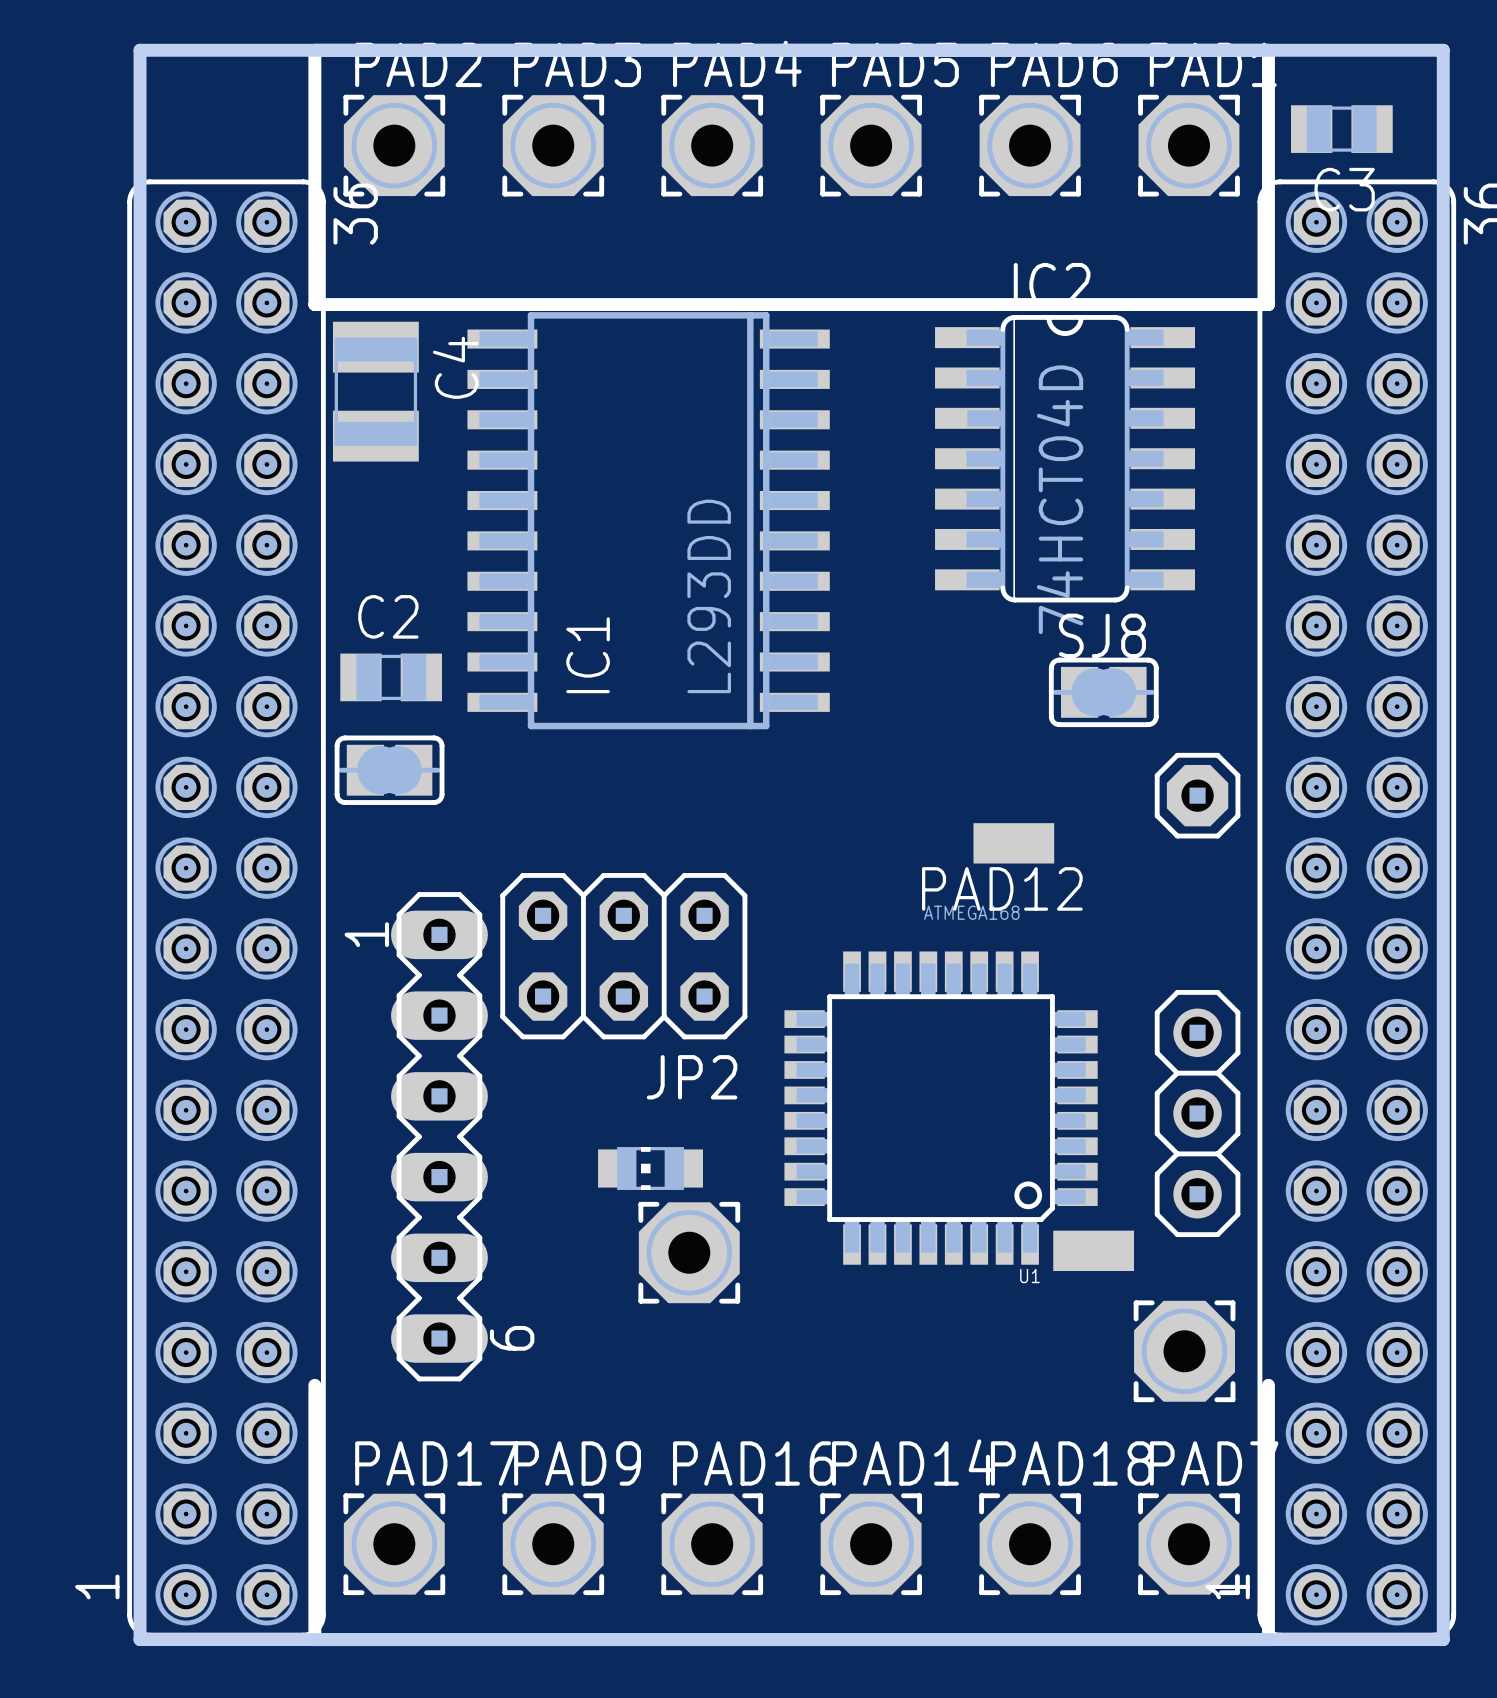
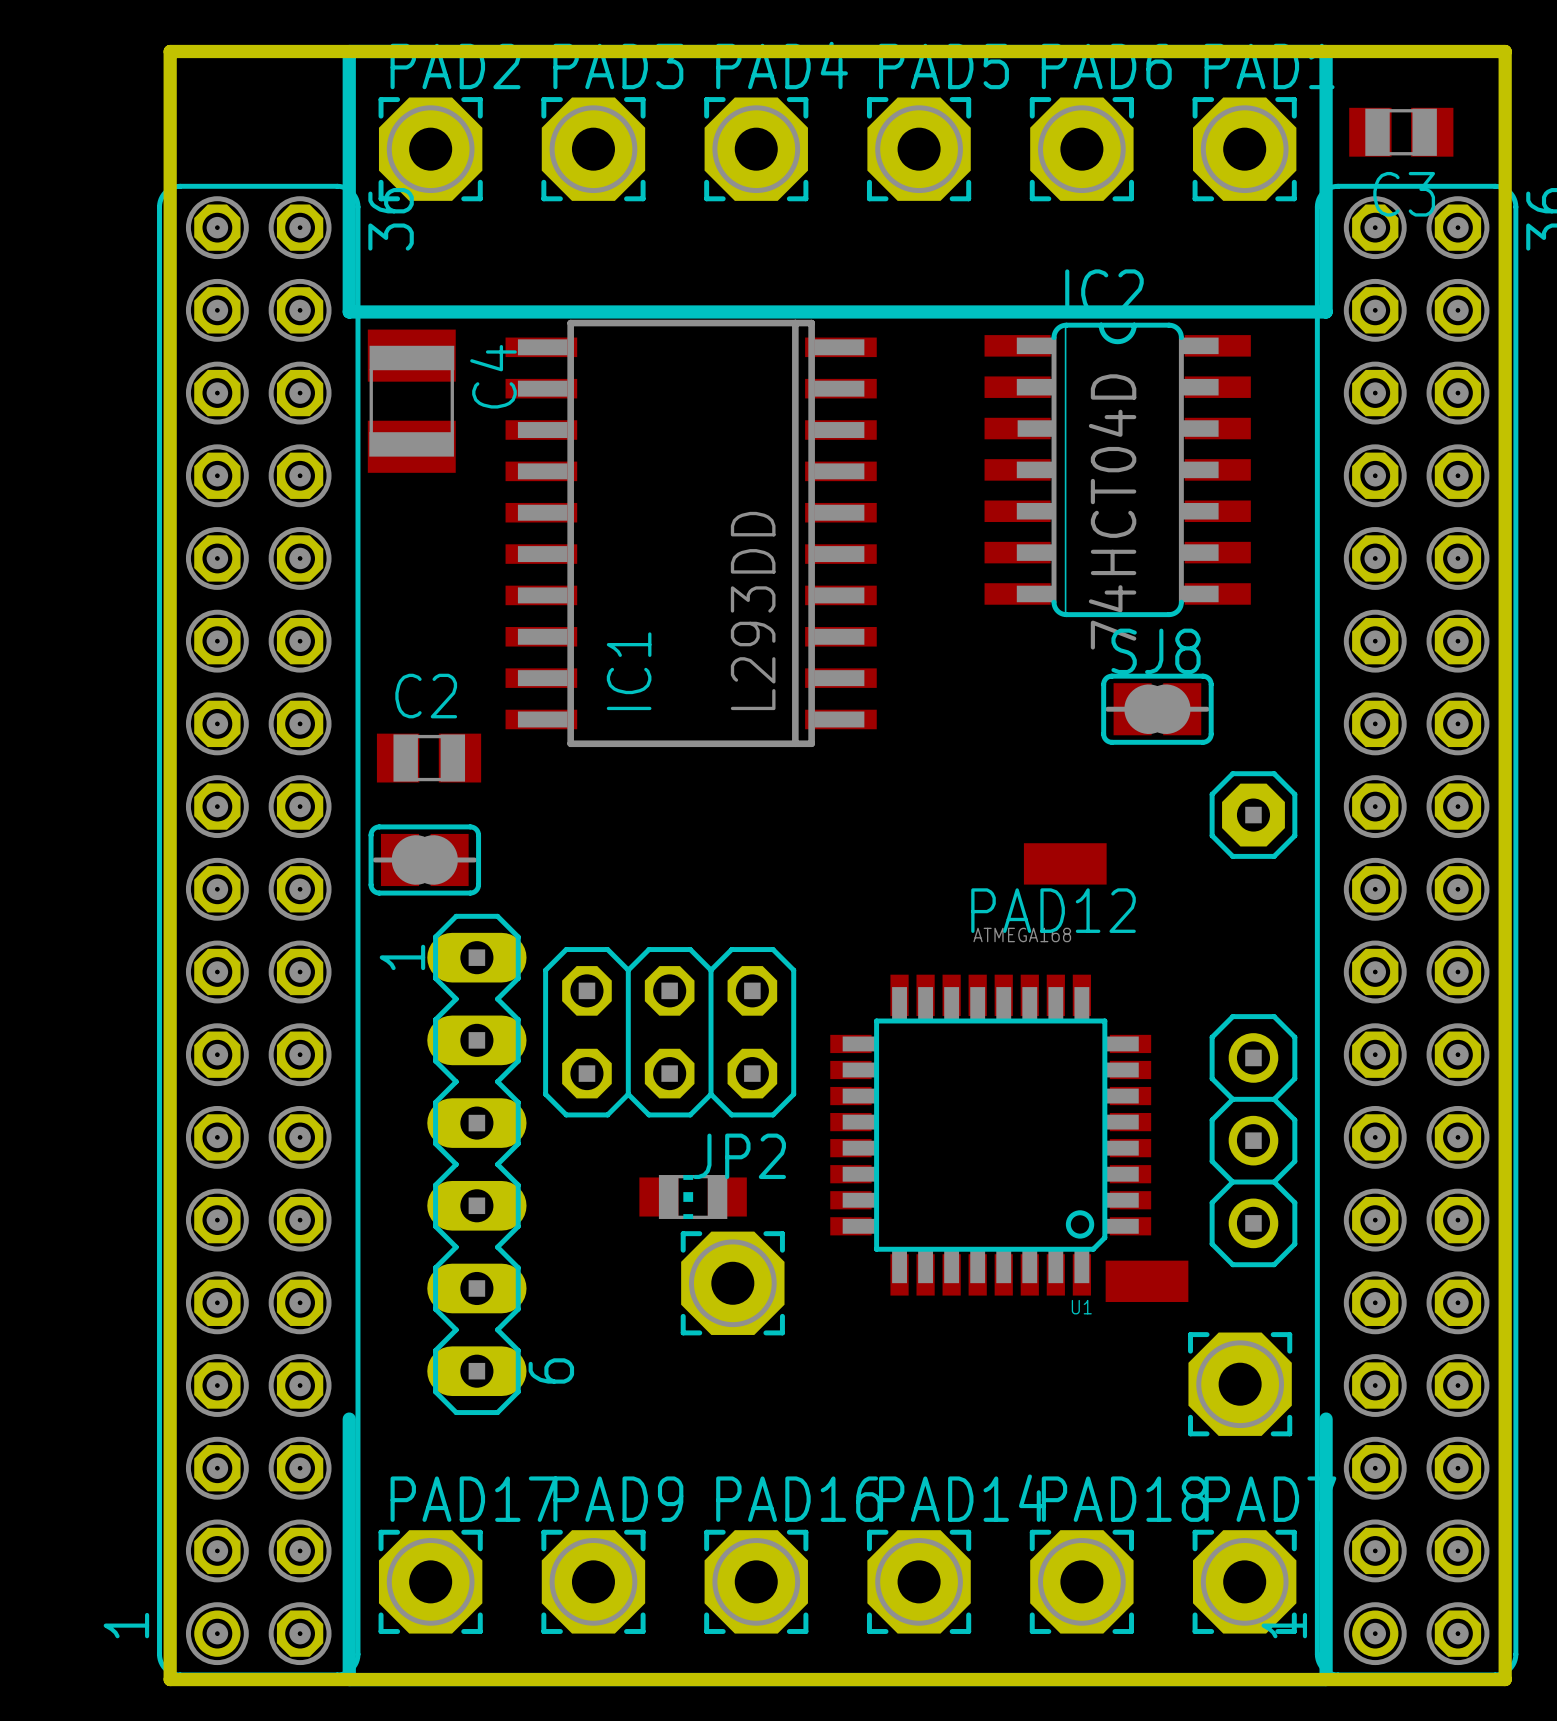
C2 position: (391, 677) -> (429, 758)
part position: (389, 770) -> (424, 859)
JP2 position: (623, 956) -> (669, 1032)

